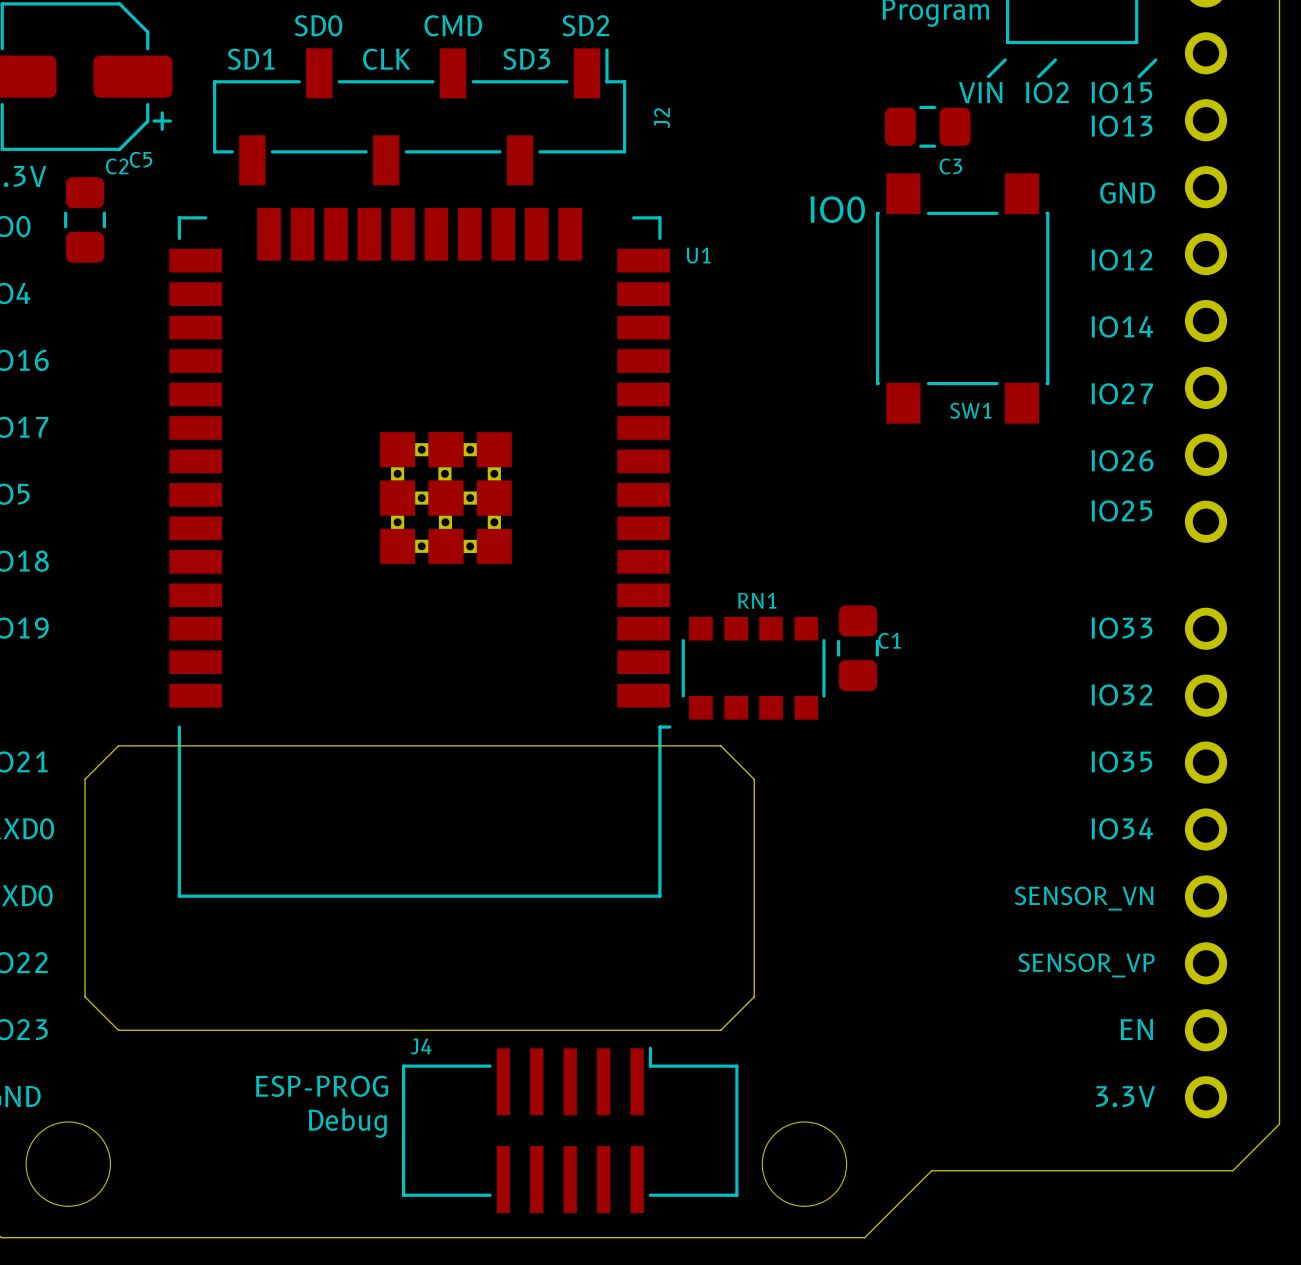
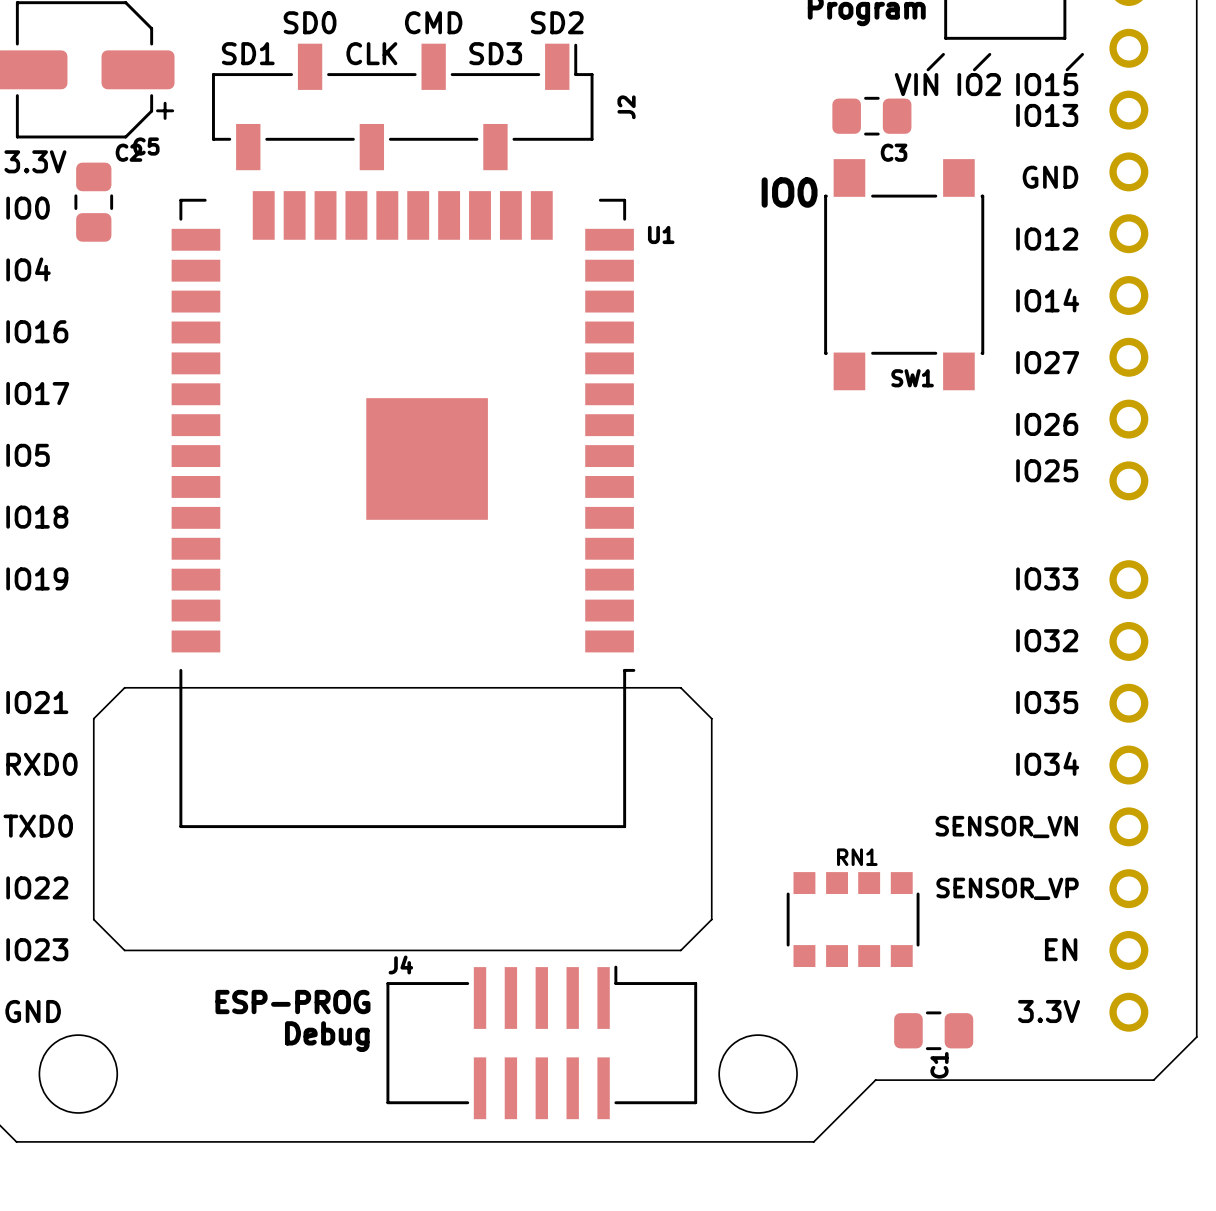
U1 footprint: [169, 207, 672, 898] -> [171, 191, 636, 829]
C1 rotation: 0° (857, 648) -> 90° clockwise (933, 1030)
C1 position: (857, 648) -> (933, 1030)
RN1 position: (753, 668) -> (853, 919)

